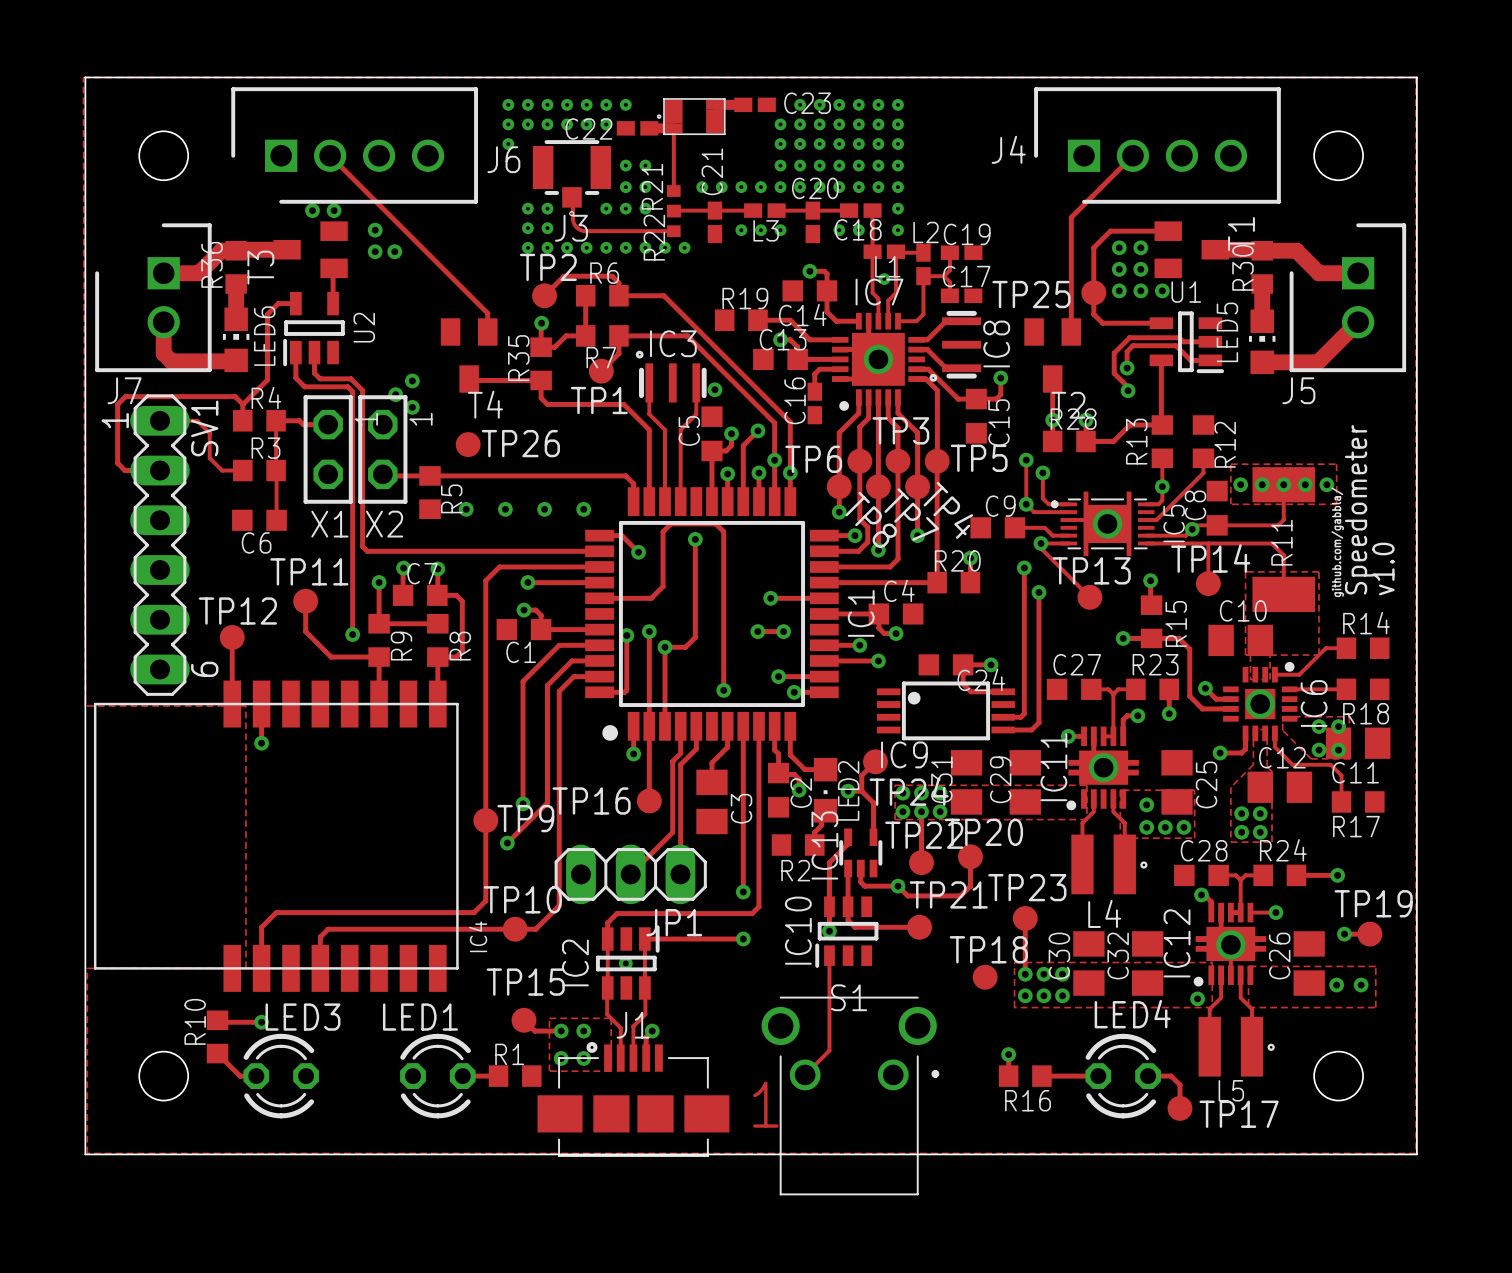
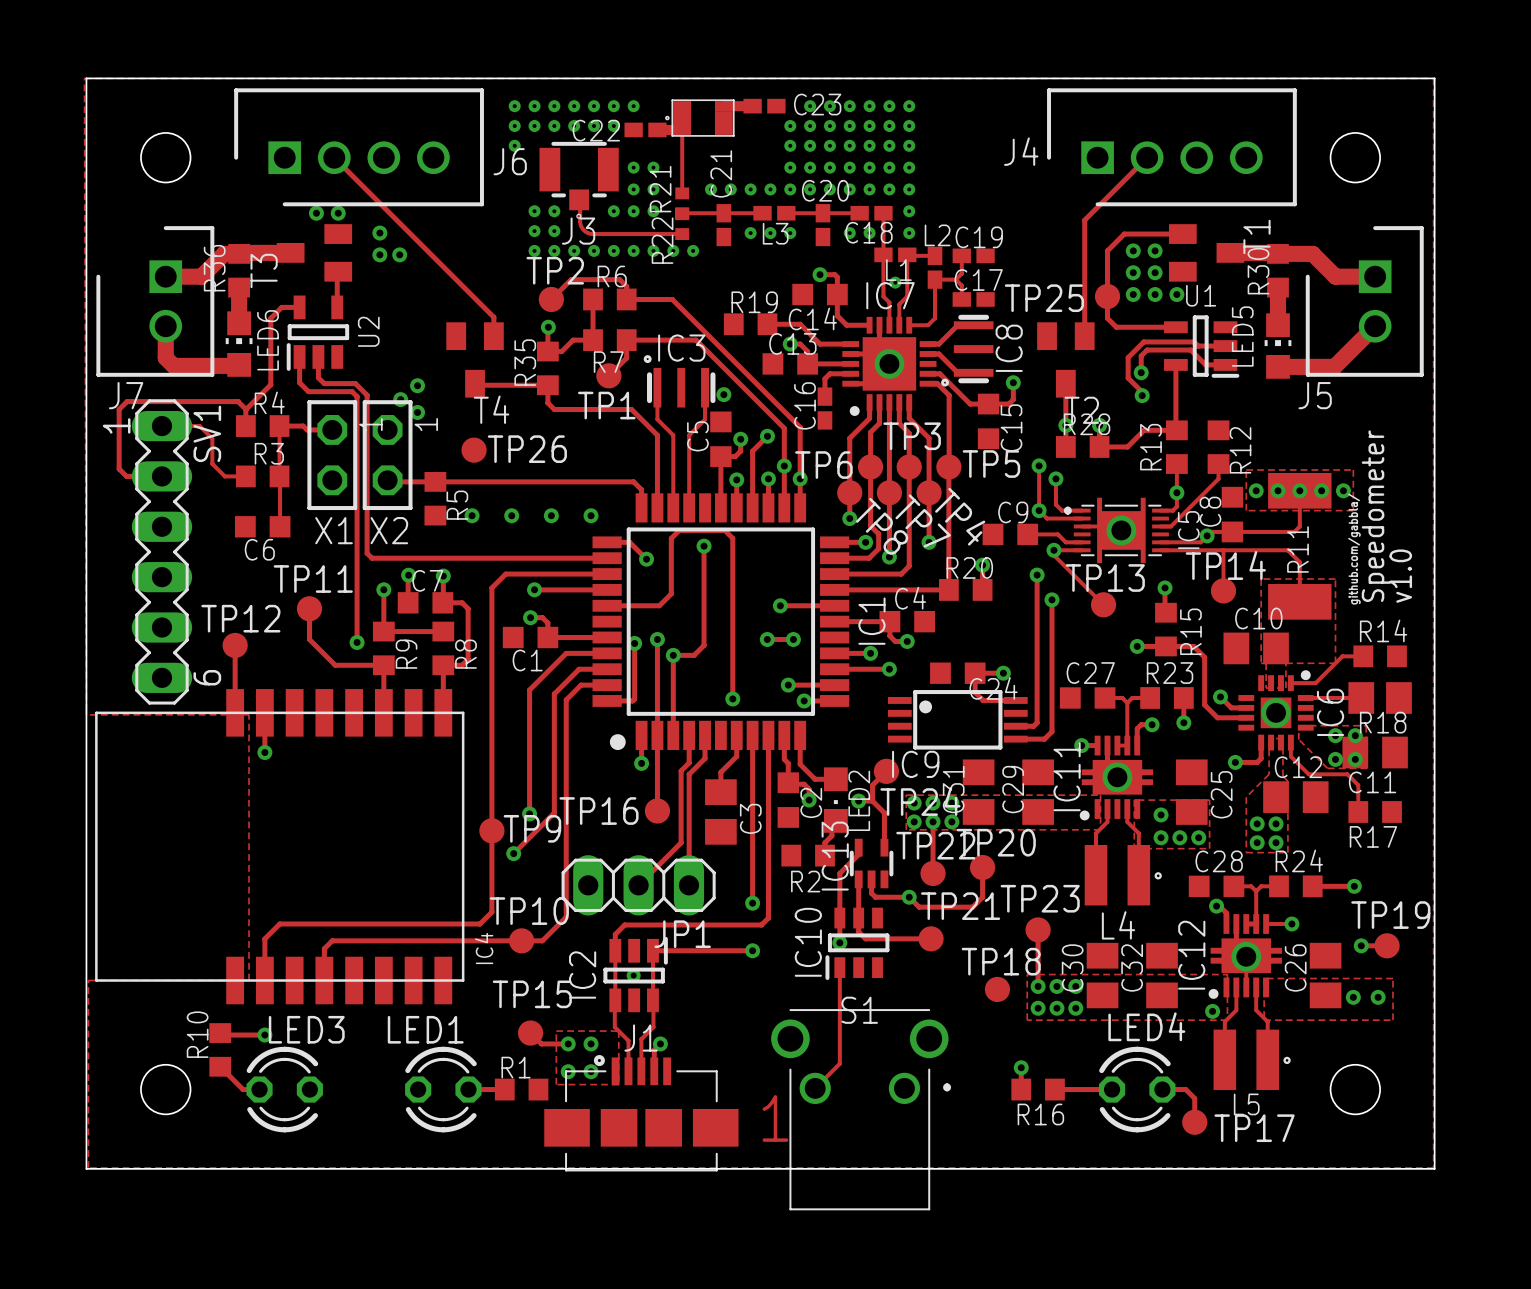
R18 footprint: [1336, 678, 1390, 701] -> [1348, 682, 1412, 714]

